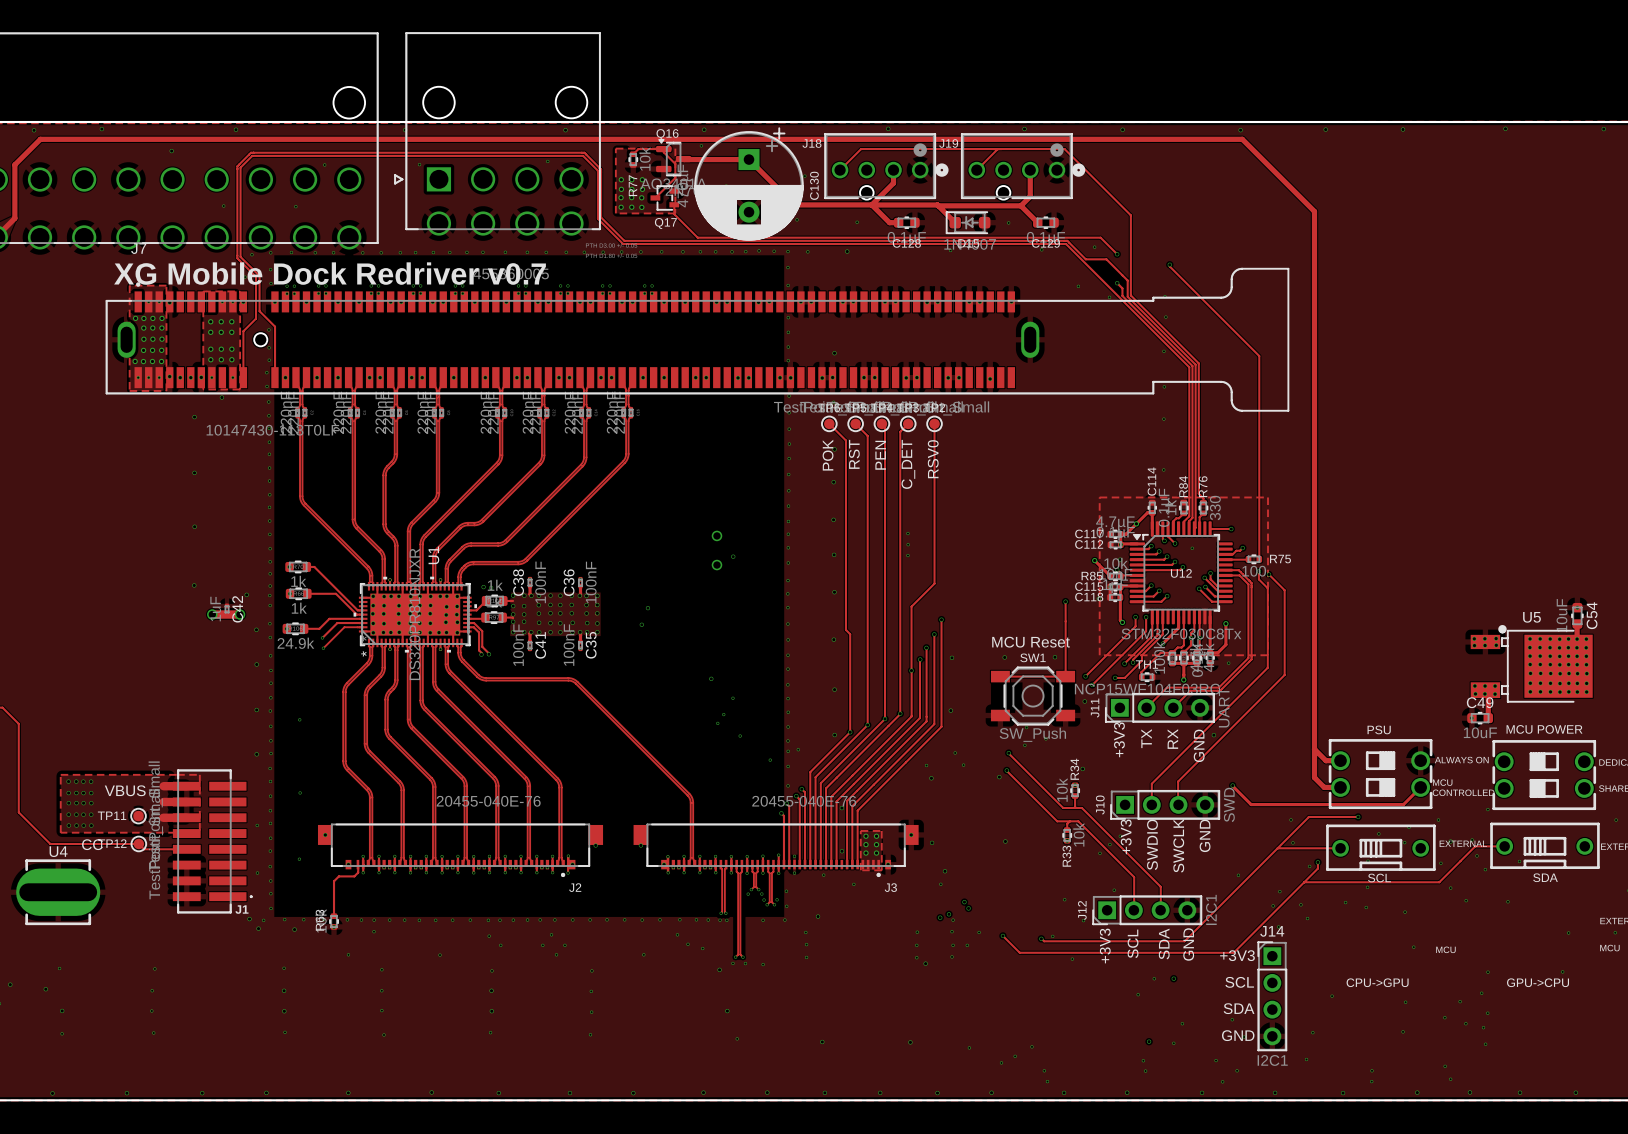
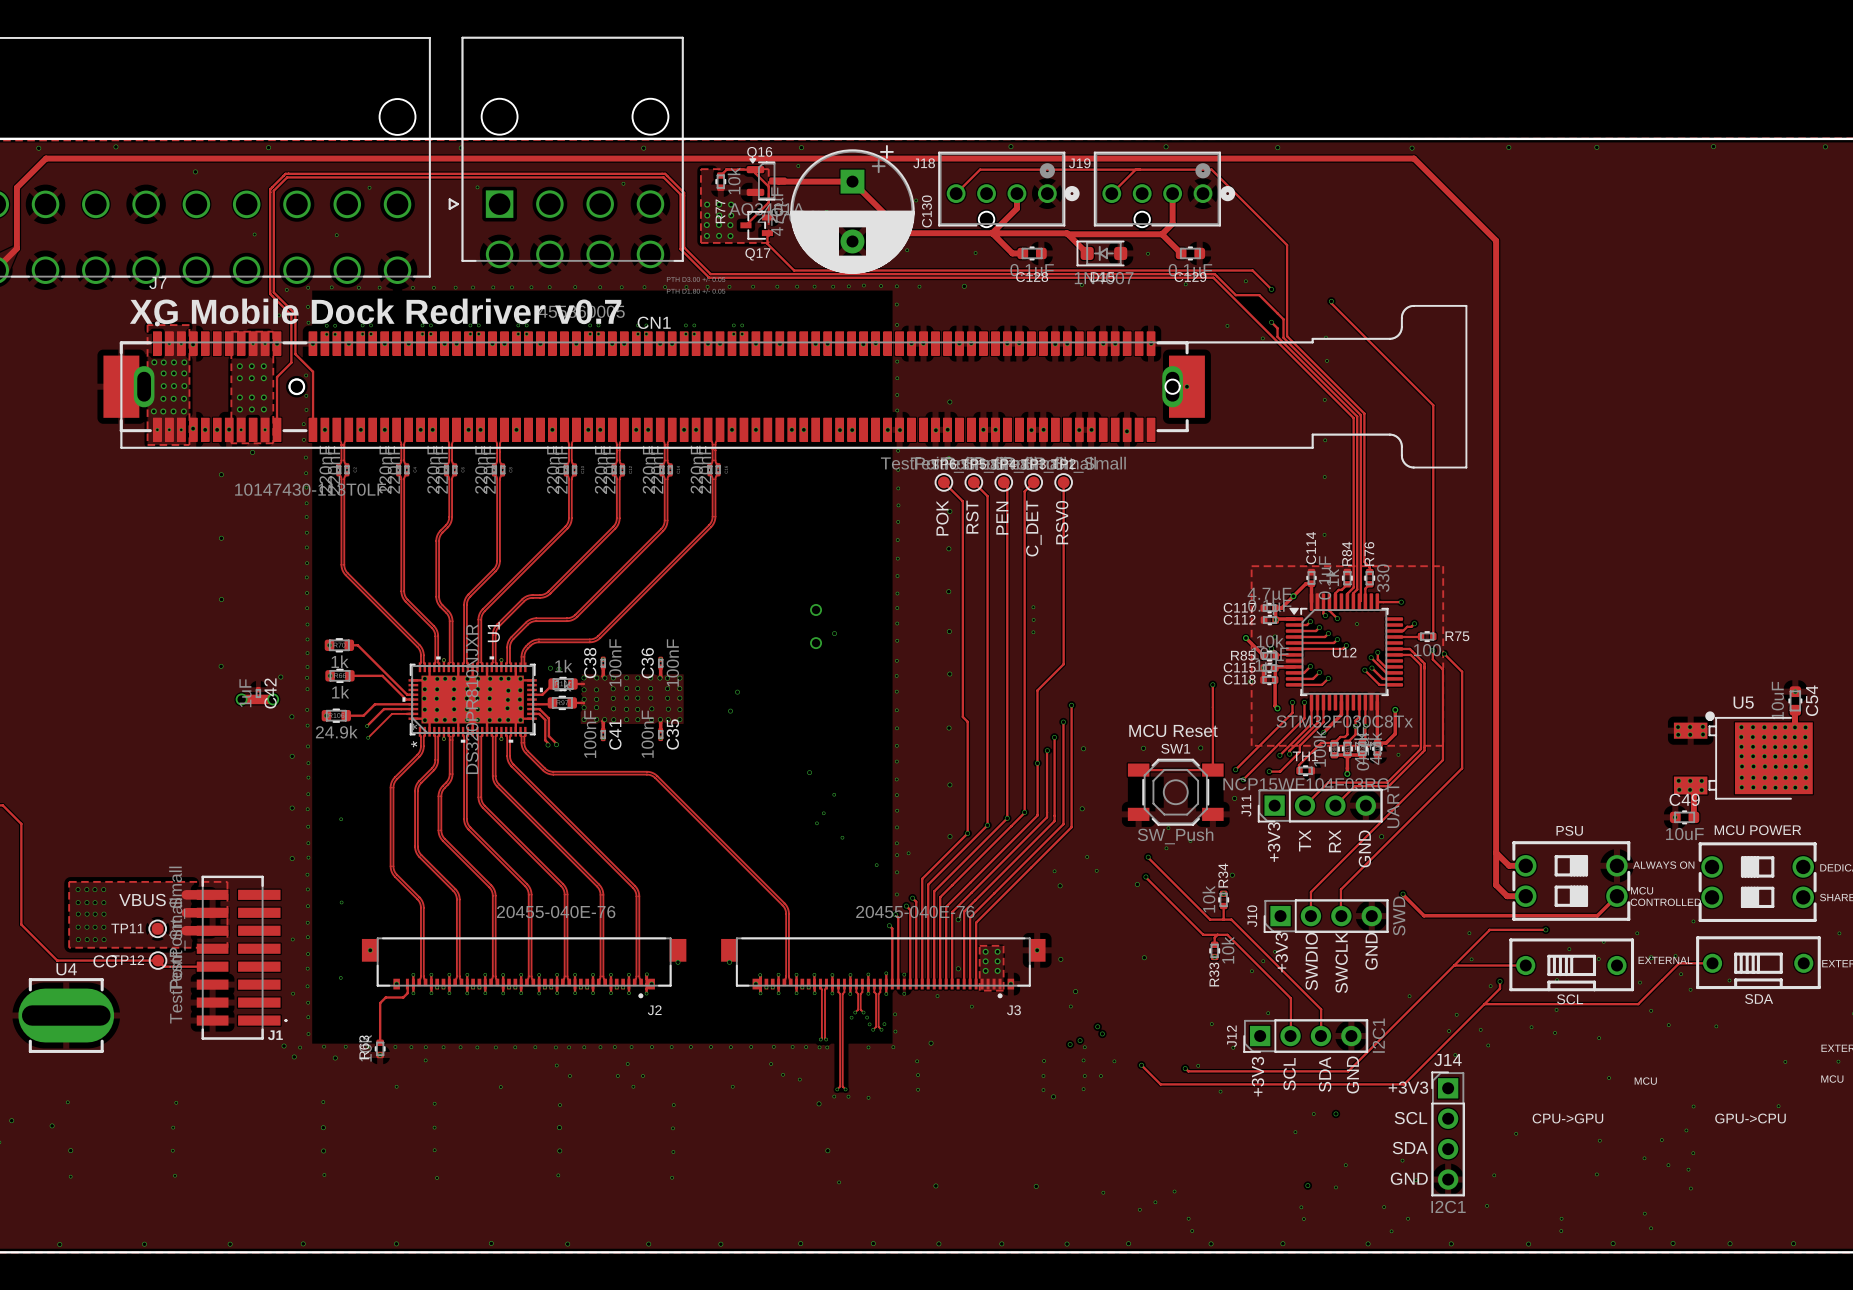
CN1: none -> (654, 386)
via: none -> (1186, 386)

